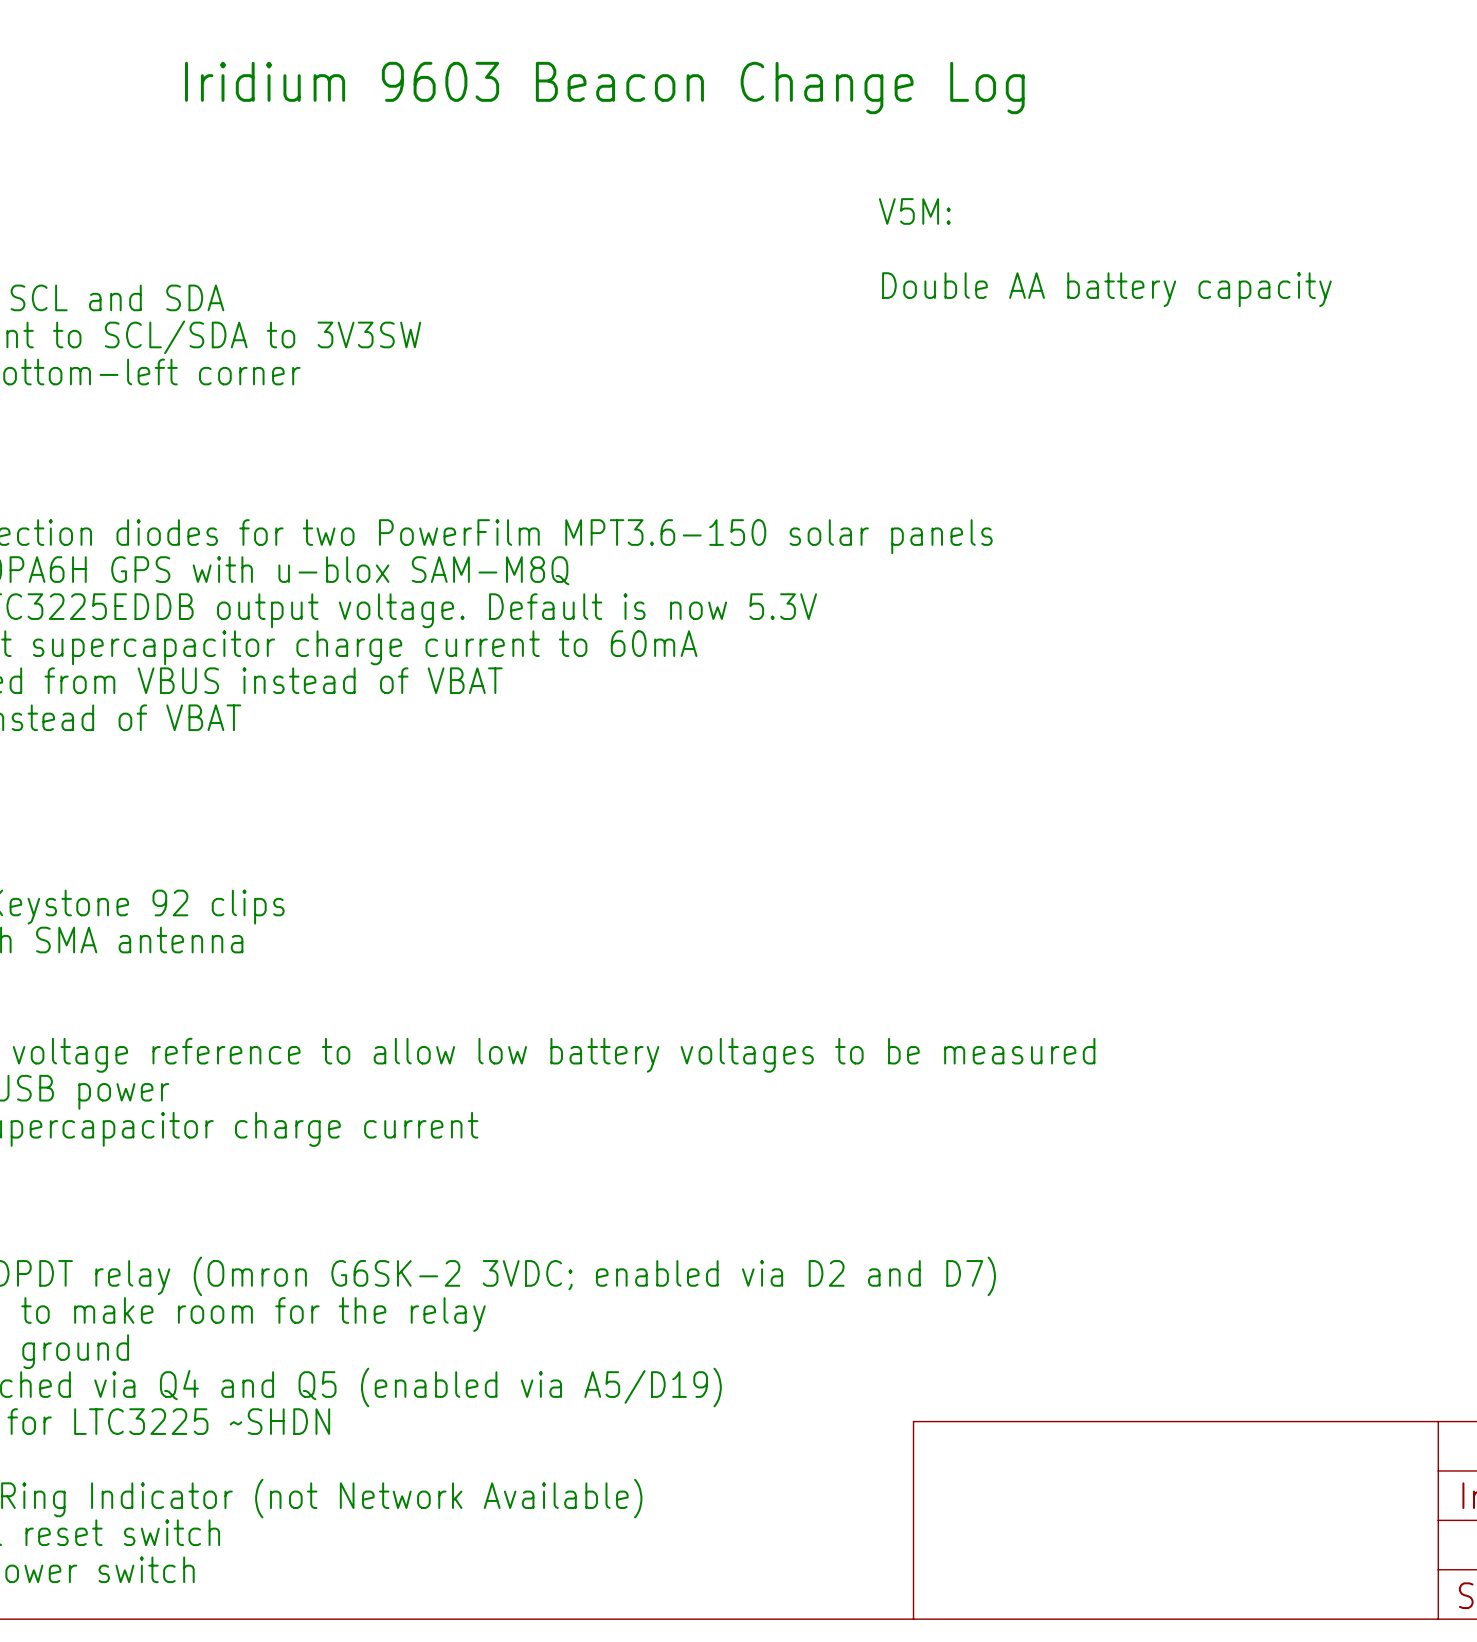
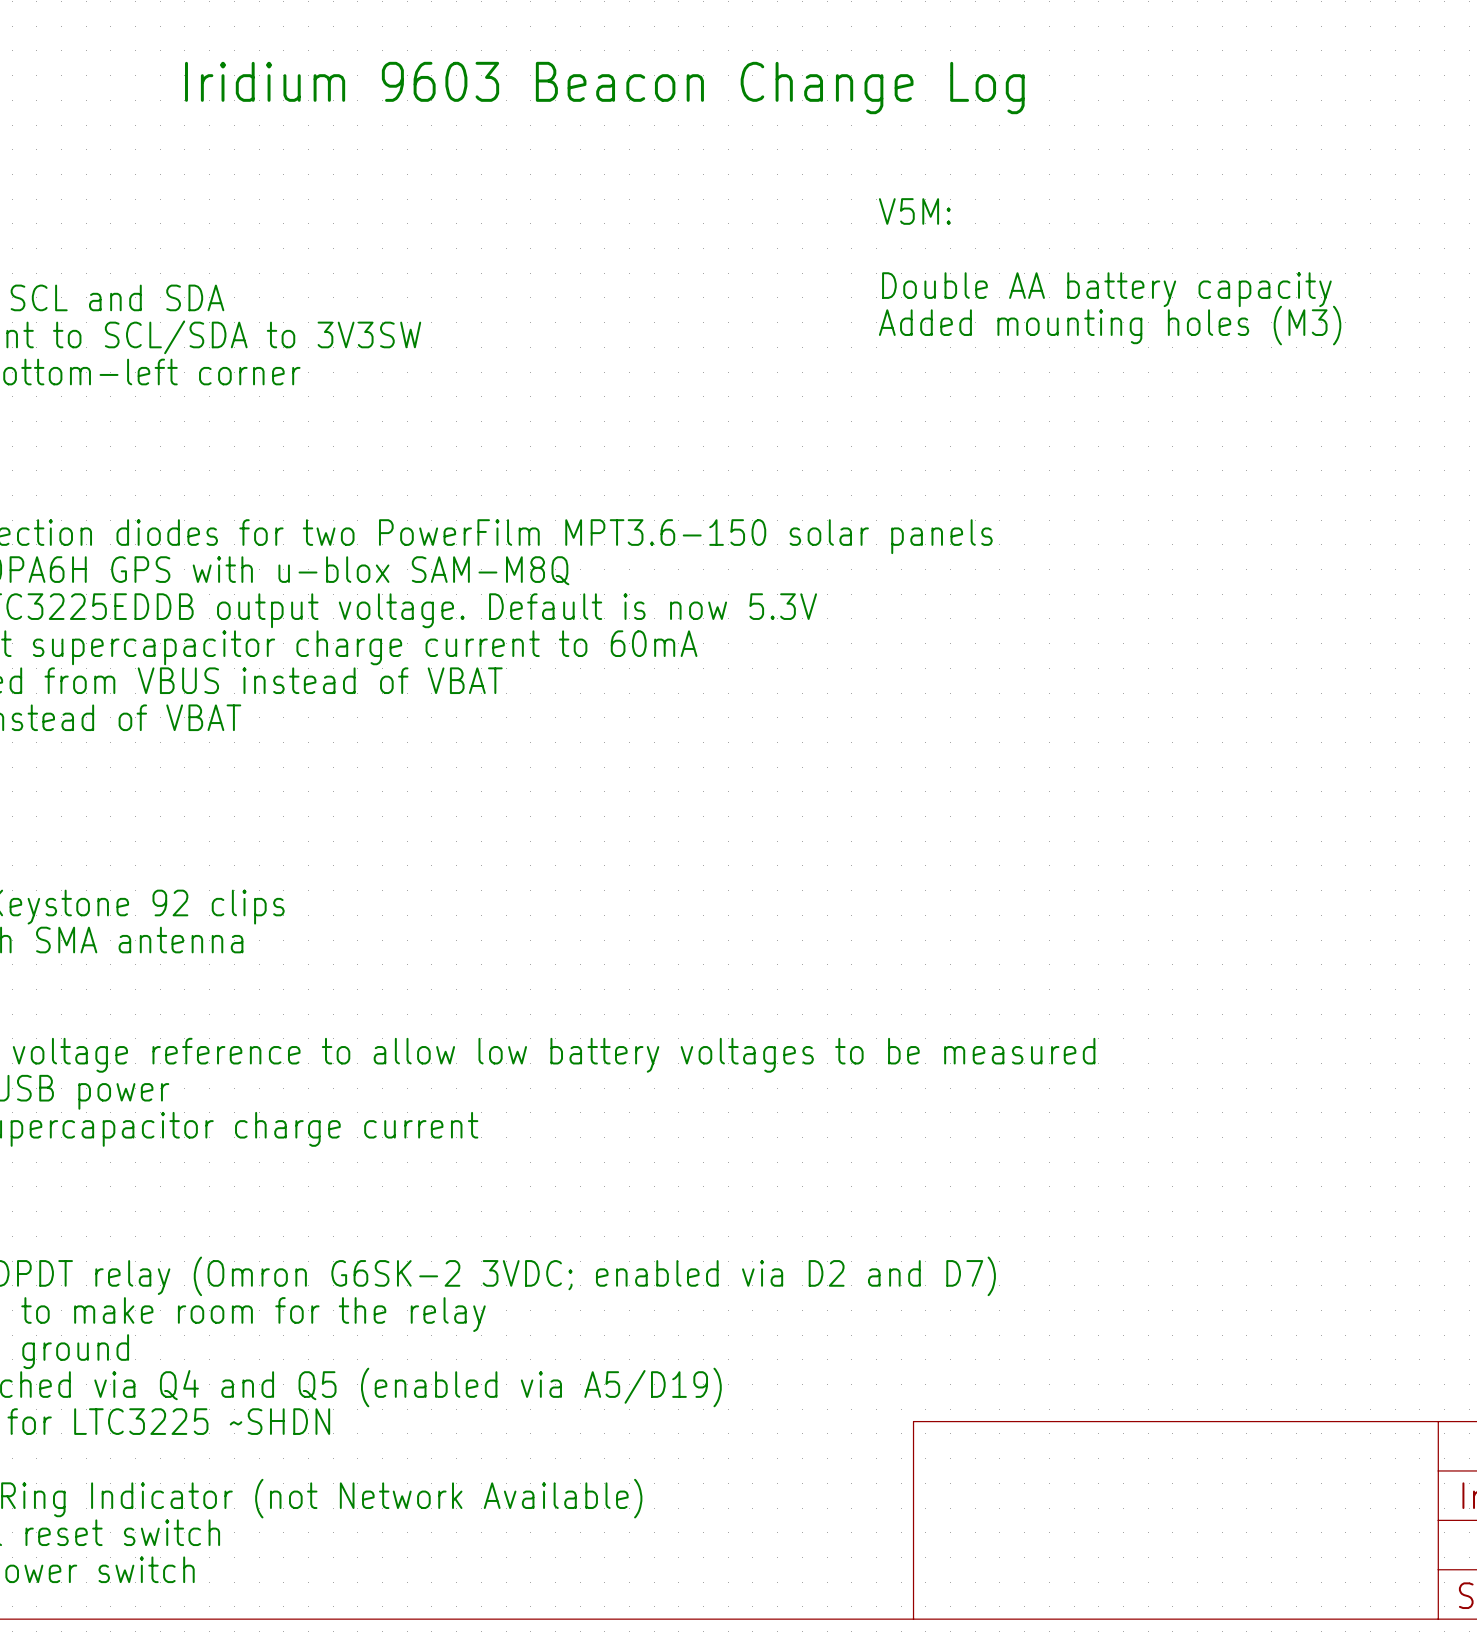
text: none -> Added mounting holes (M3) (1110, 325)

